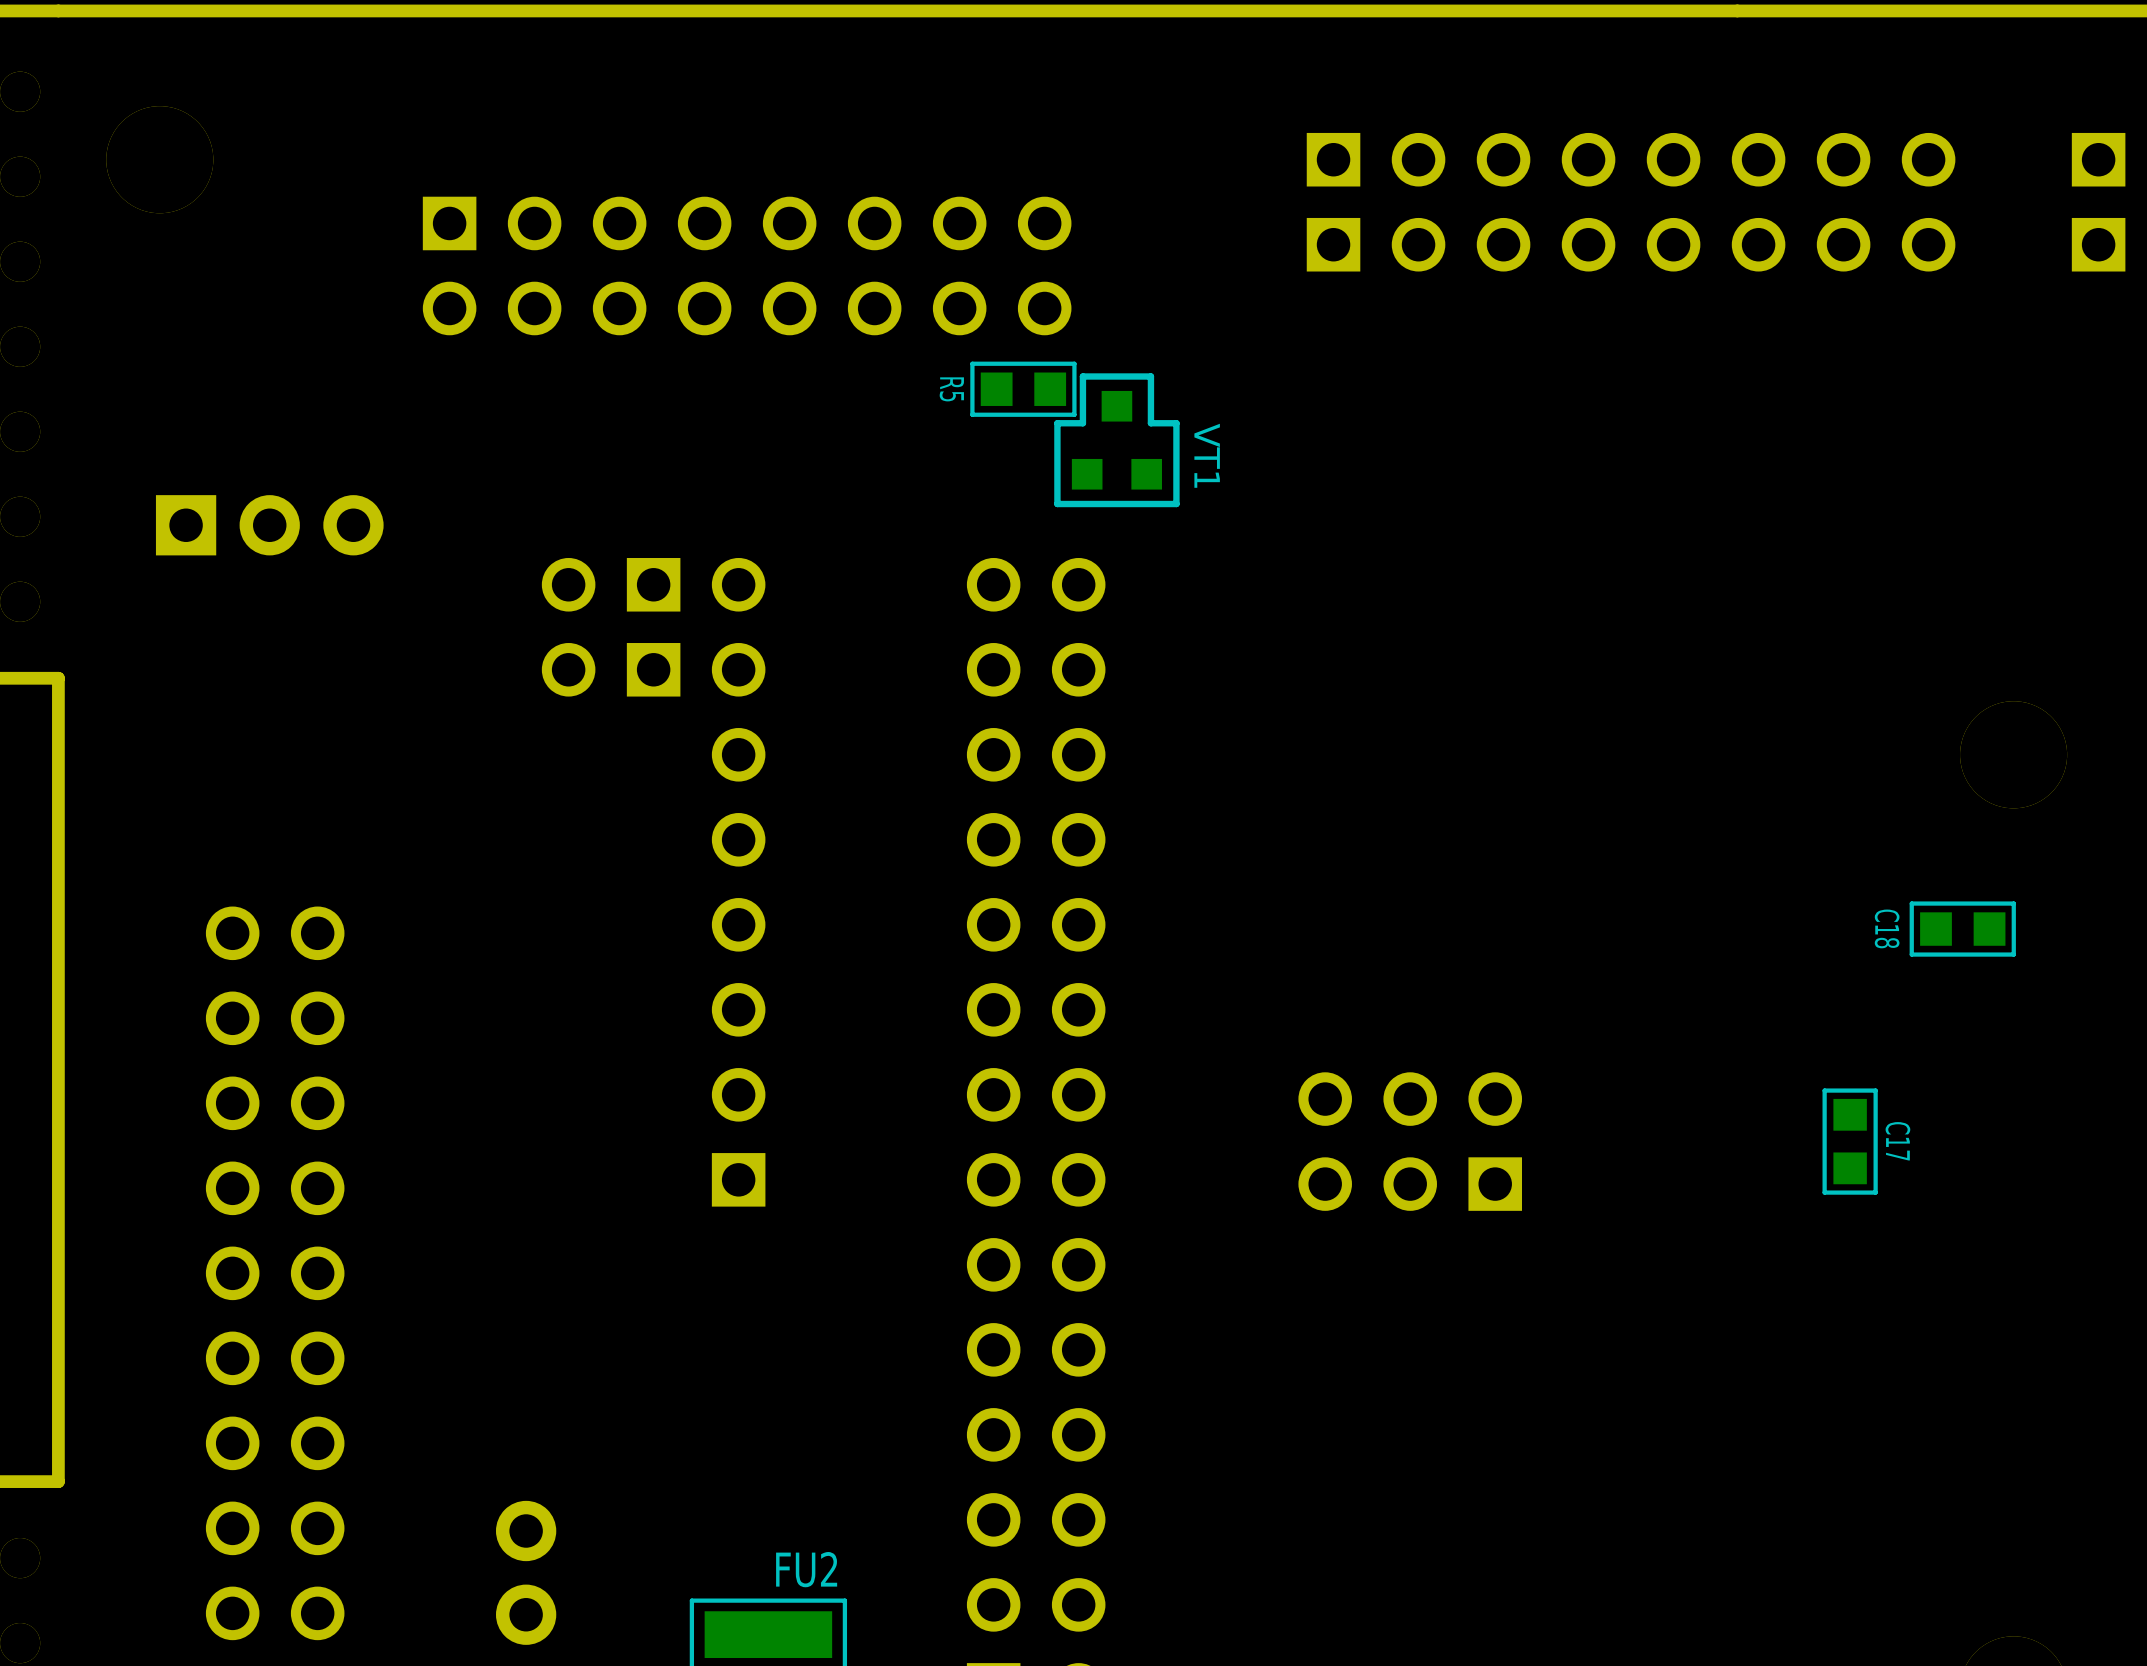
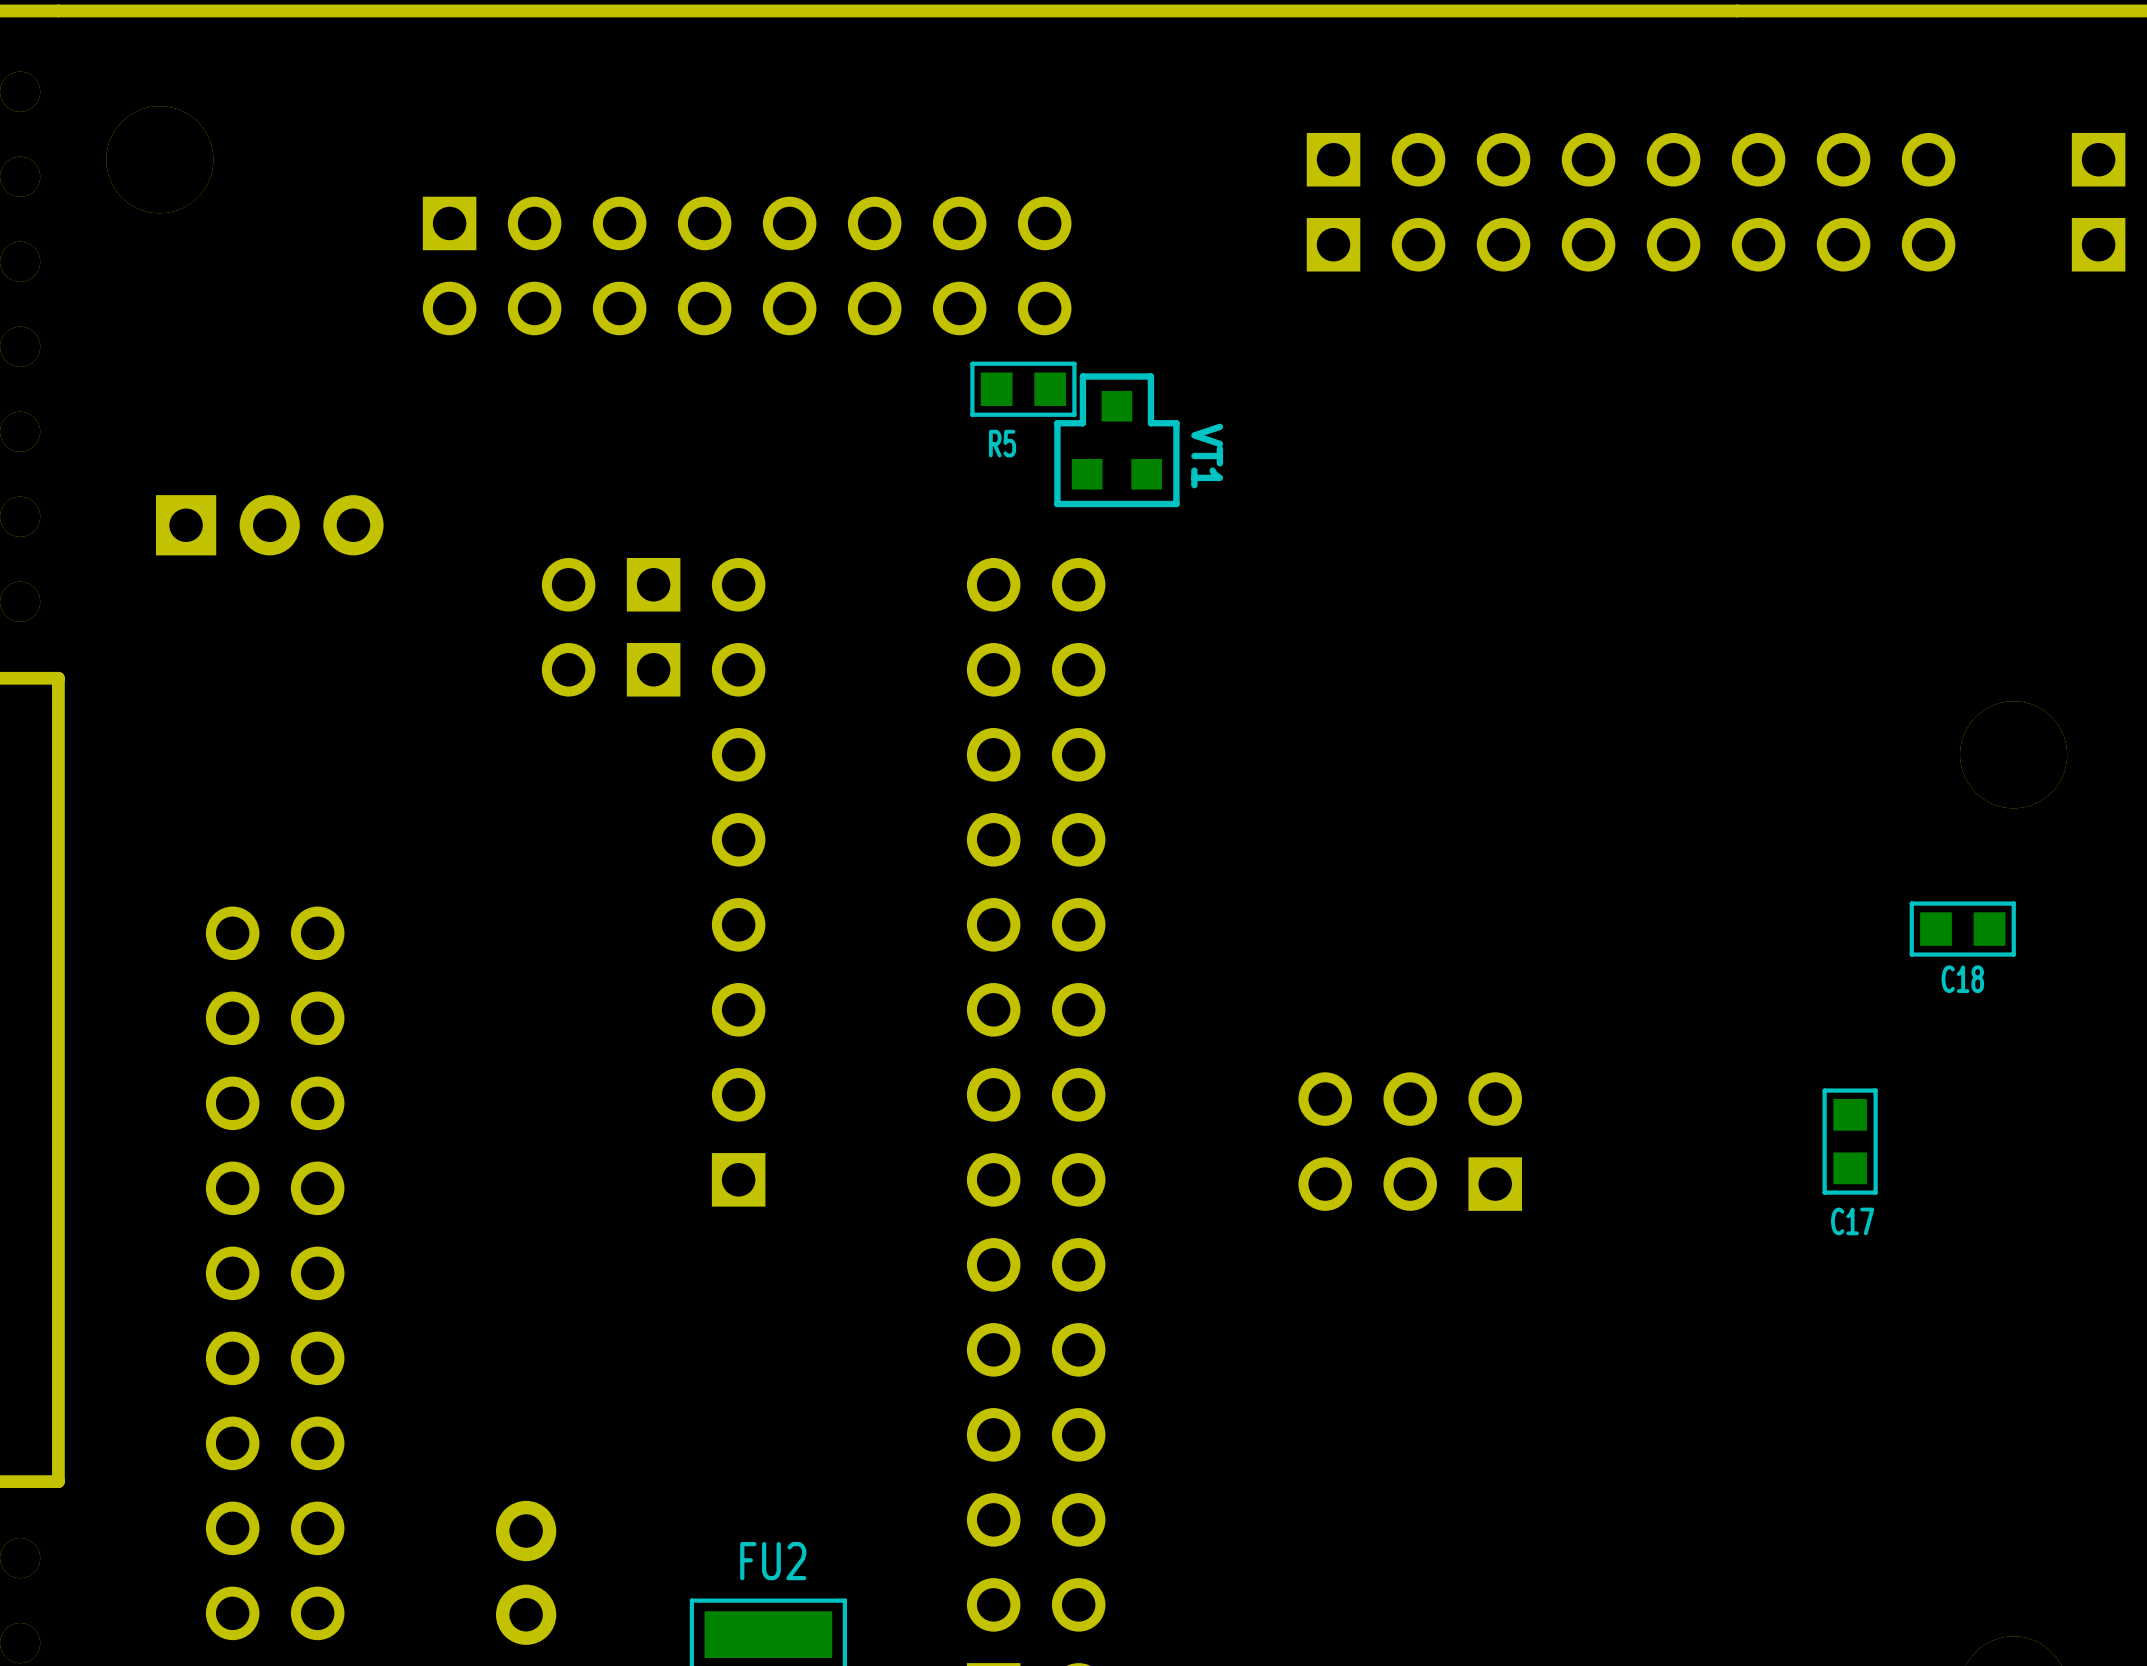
R5 name rotation: 0° (951, 389) -> 90° counterclockwise (1002, 443)
R5 name position: R5 (951, 389) -> R5 (1002, 443)
C18 name rotation: 0° (1887, 928) -> 90° counterclockwise (1962, 979)
C18 name position: C18 (1887, 928) -> C18 (1962, 979)
C17 name rotation: 0° (1897, 1141) -> 90° counterclockwise (1852, 1221)
C17 name position: C17 (1897, 1141) -> C17 (1852, 1221)
FU2 name position: FU2 (806, 1569) -> FU2 (773, 1561)

